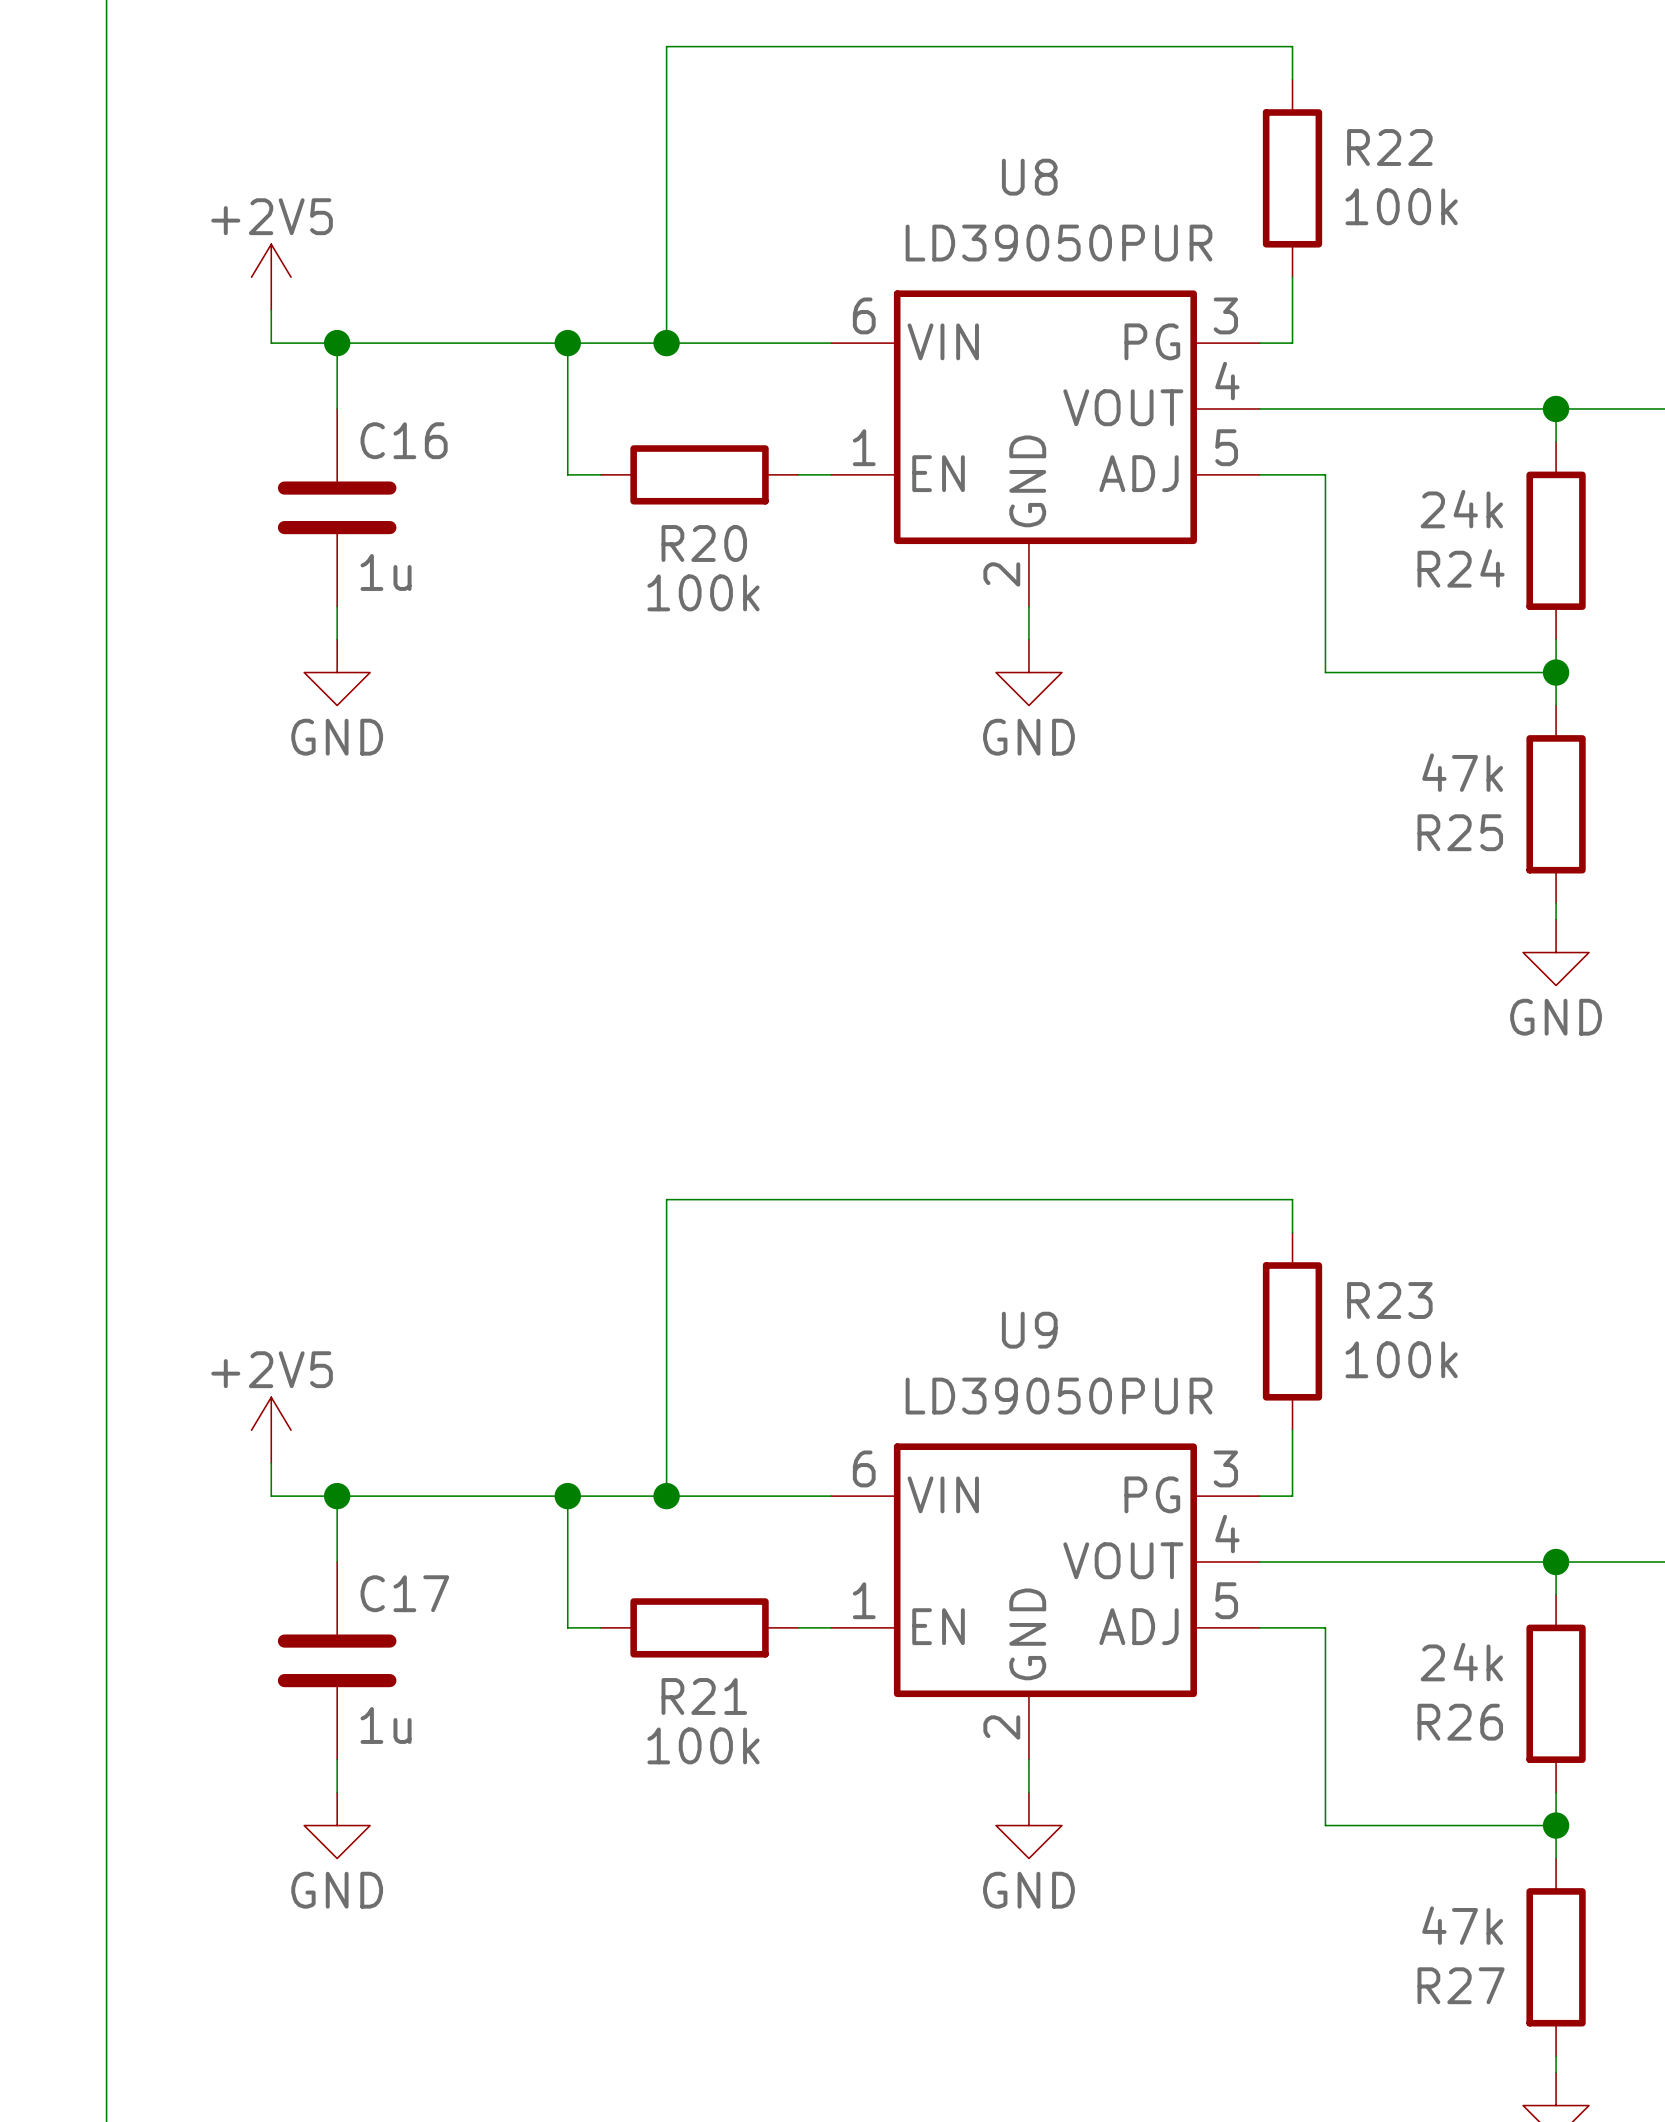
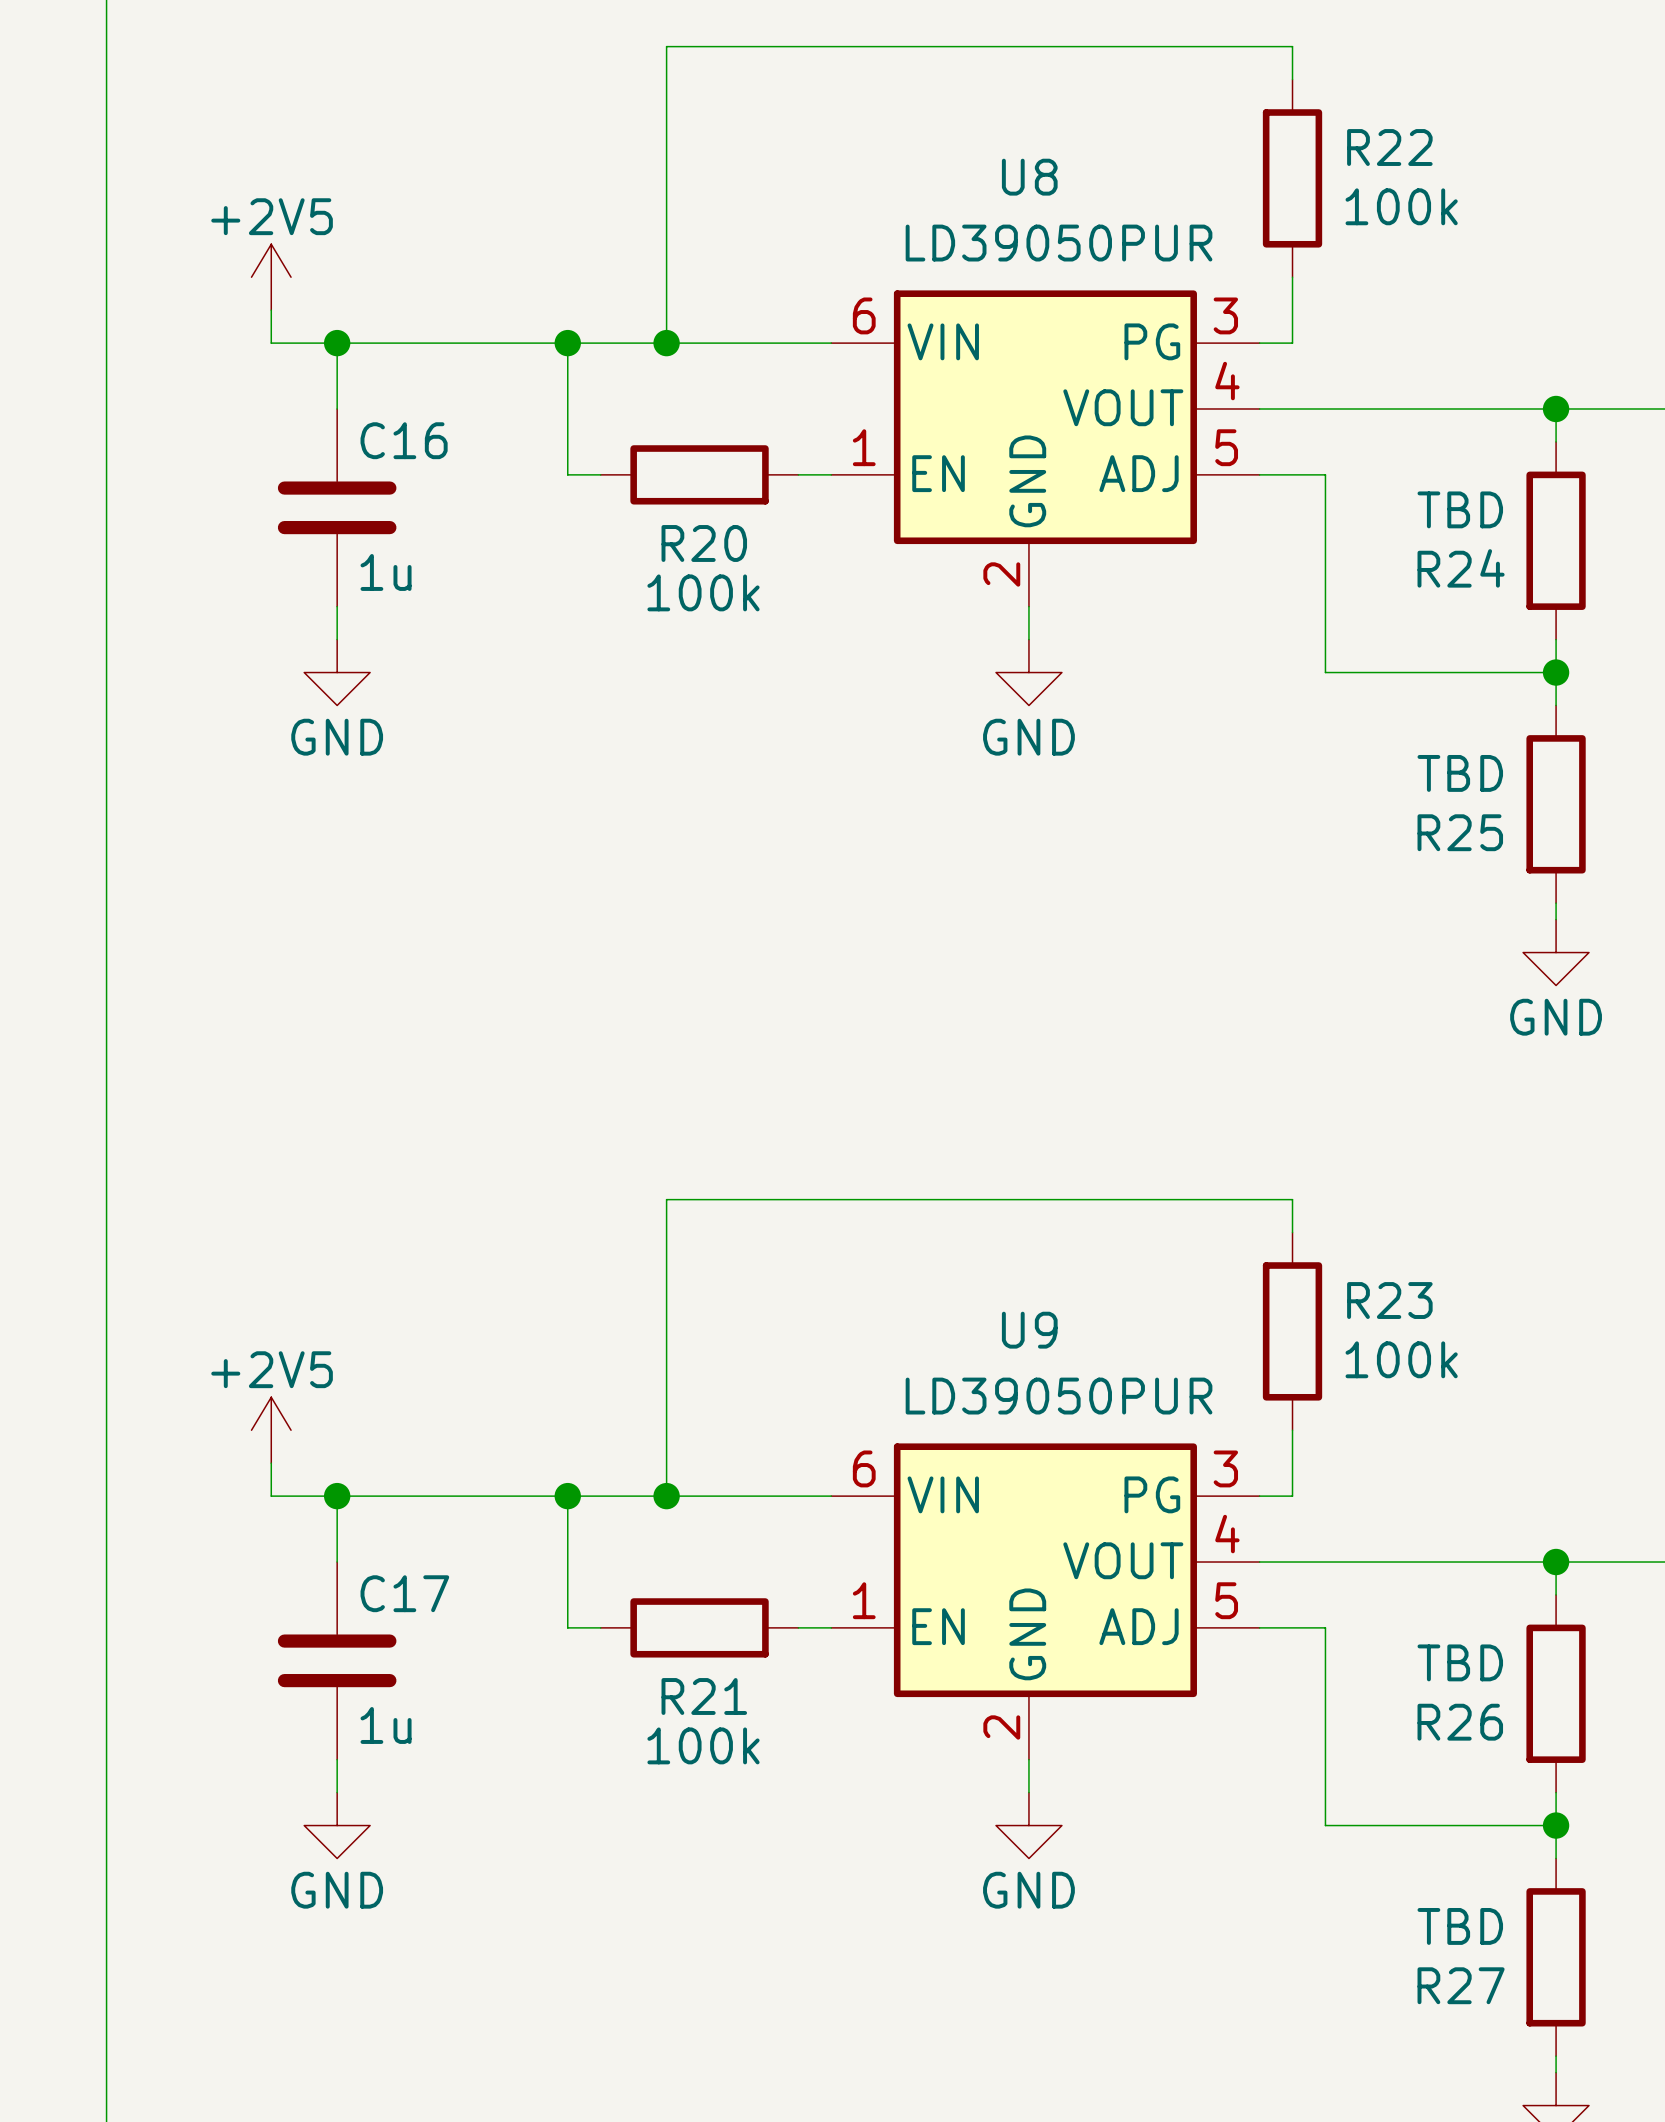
R24 value: 24k (1461, 509) -> TBD (1460, 509)
R25 value: 47k (1462, 772) -> TBD (1460, 773)
R26 value: 24k (1461, 1662) -> TBD (1460, 1662)
R27 value: 47k (1462, 1925) -> TBD (1460, 1926)

